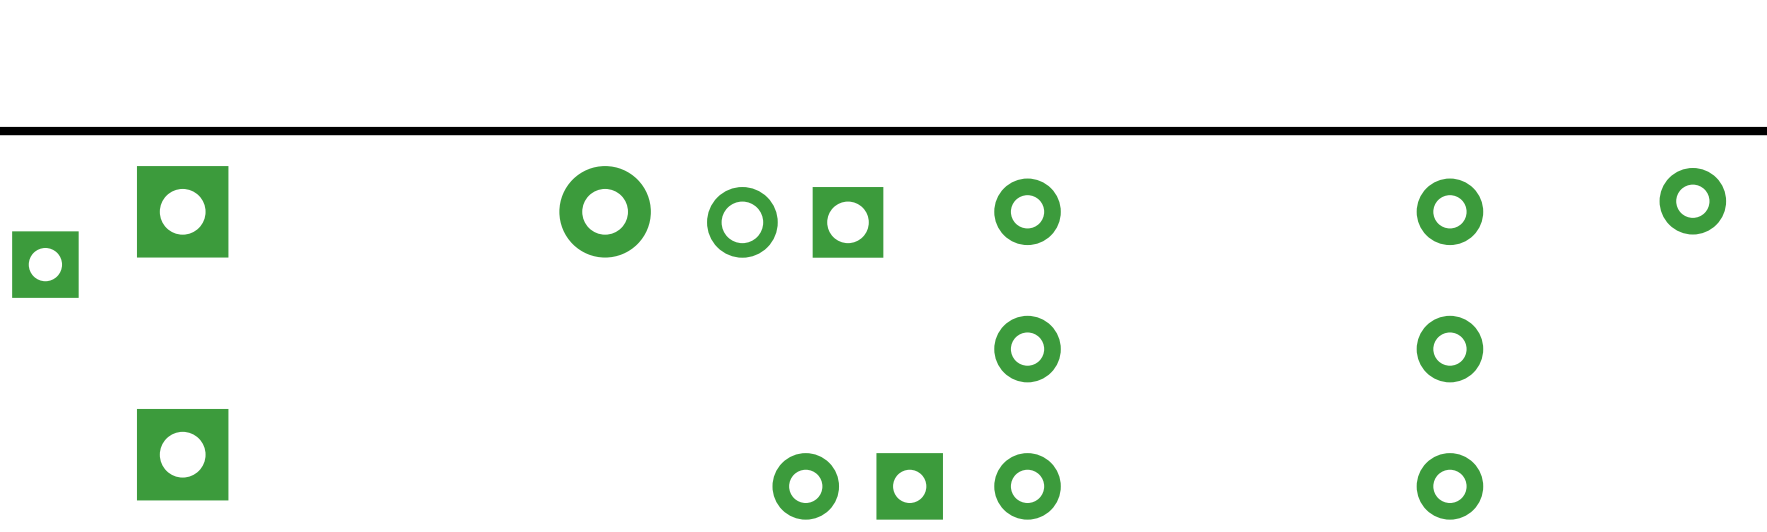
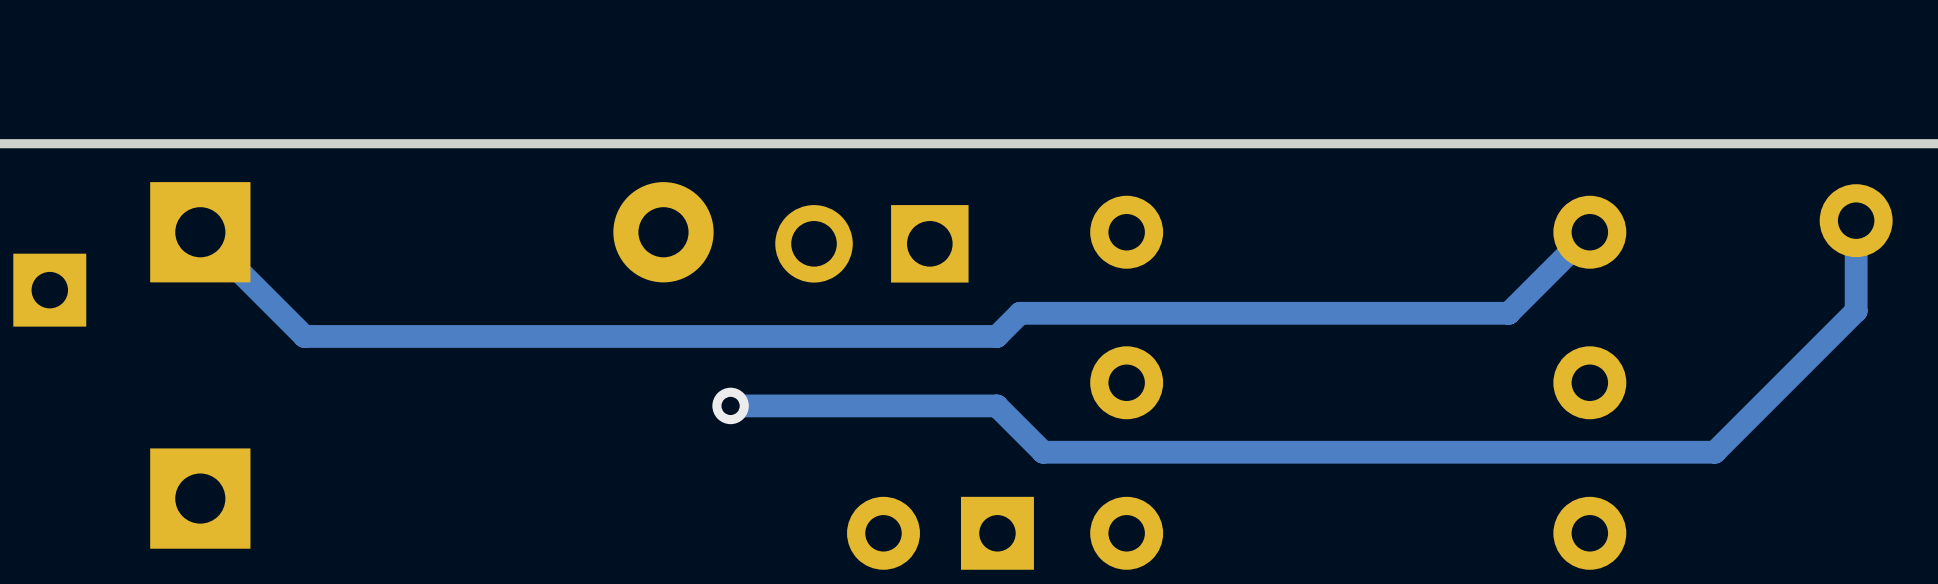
track: none -> (1856, 220) (1856, 310) (1714, 452) (1043, 452) (996, 405) (730, 405)
track: none -> (1589, 232) (1508, 313) (1020, 313) (996, 336) (304, 336) (200, 232)
via: none -> (730, 405)

